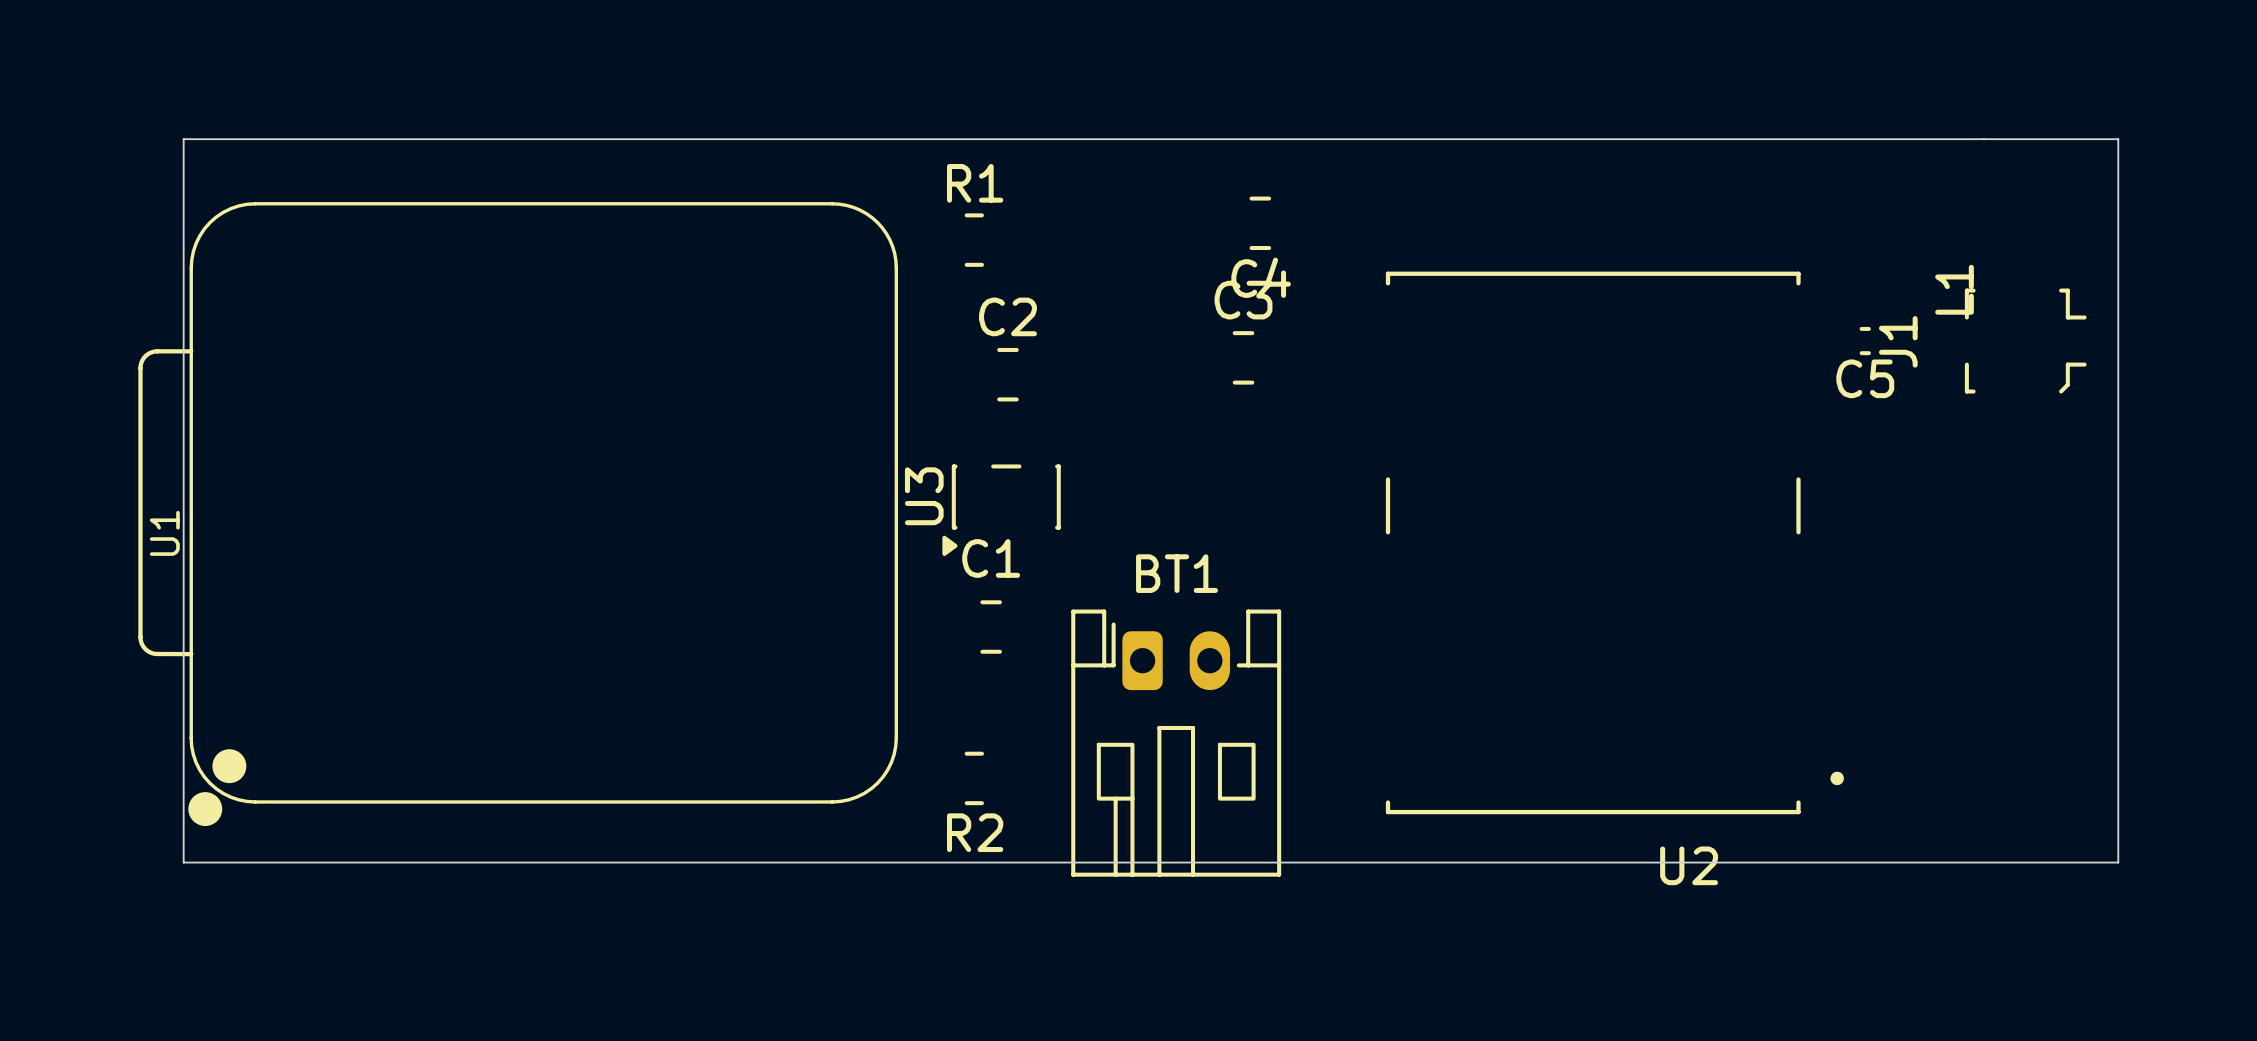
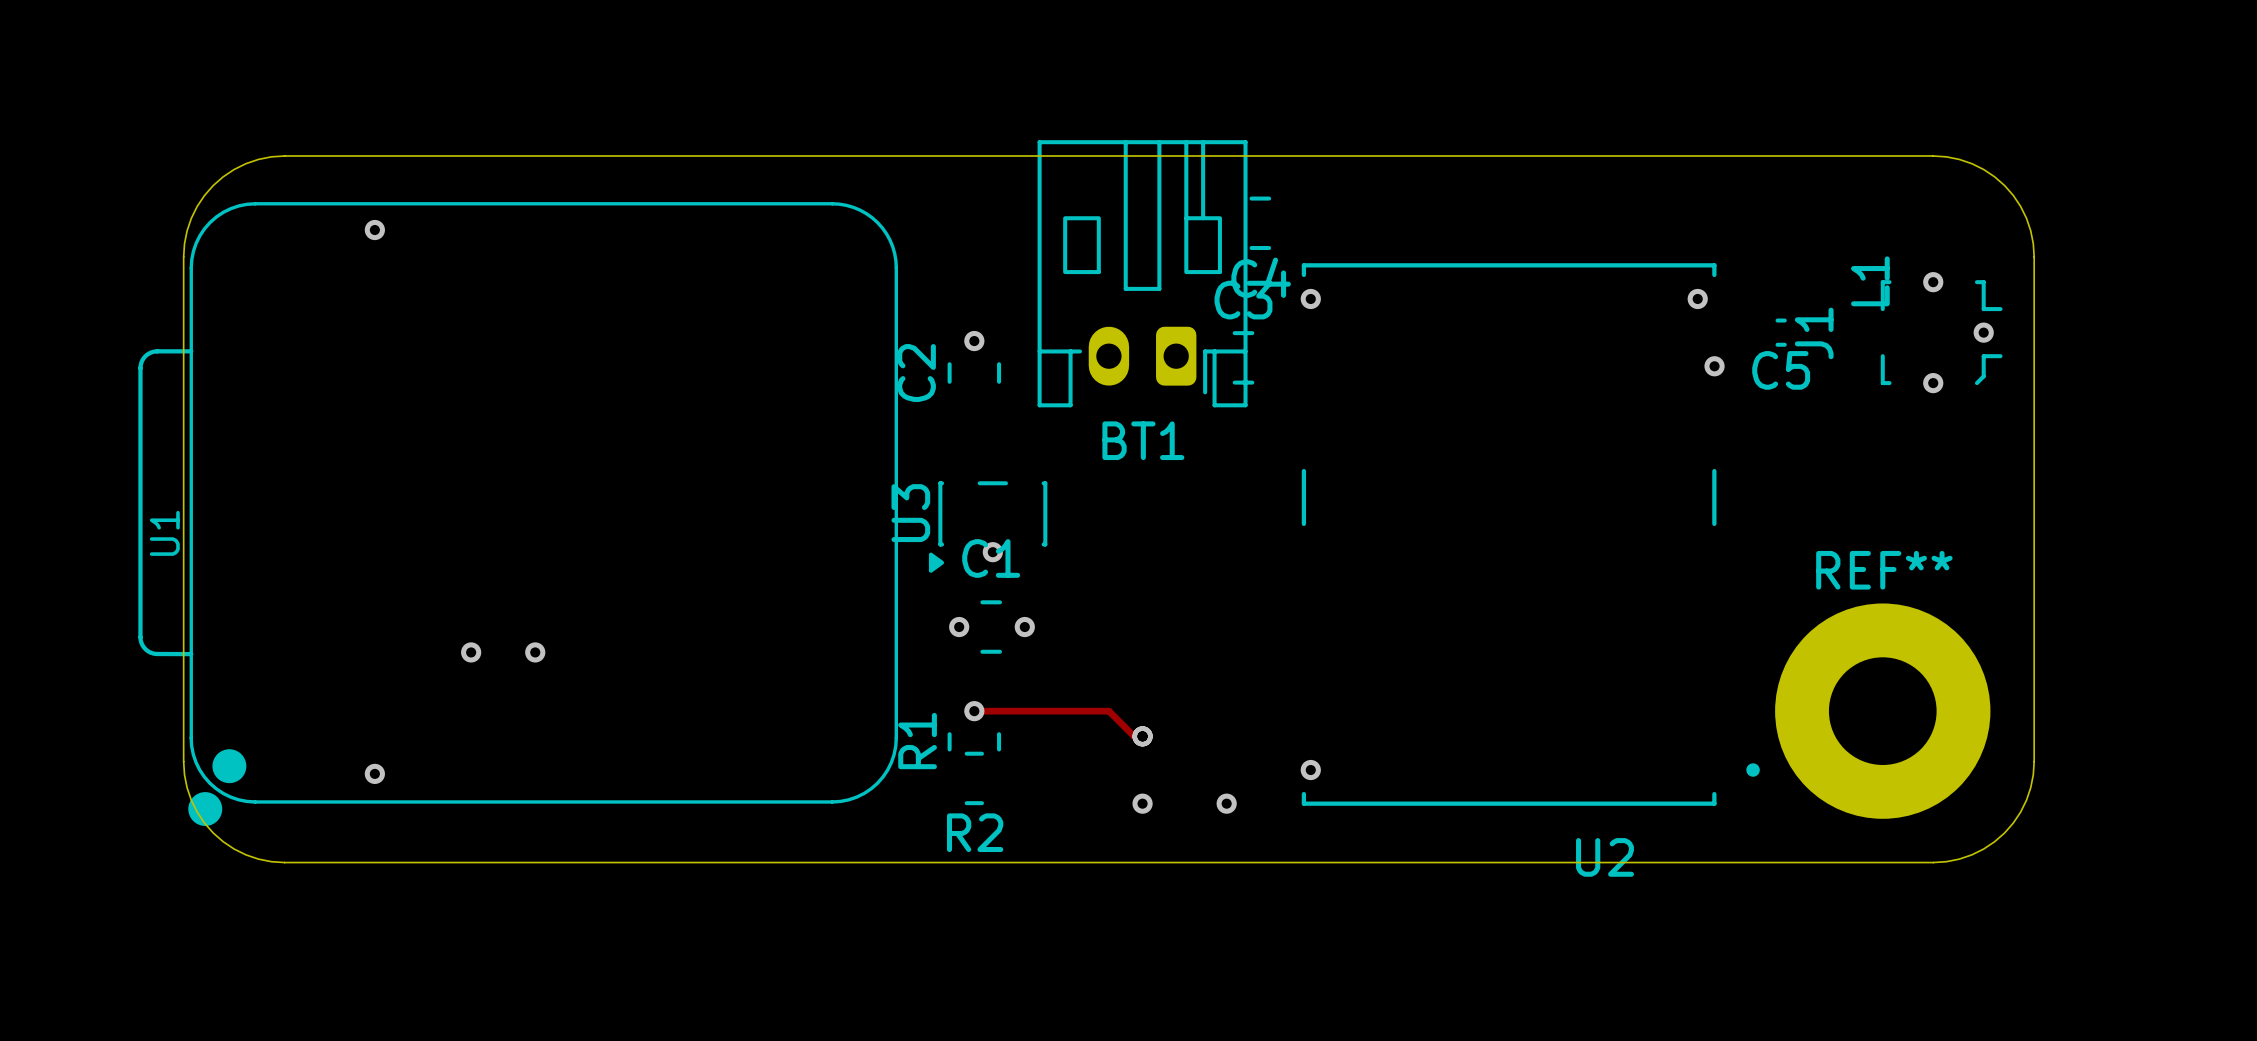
R1 name position: R1 (975, 183) -> R1 (917, 741)
via: none -> (374, 230)
R1 rotation: 0° (974, 240) -> 90° clockwise (974, 741)
R1 position: (974, 240) -> (974, 741)
board edge: (183, 256) (183, 139) (2118, 139) (2118, 862) (1933, 862) -> (183, 256) (184, 243) (191, 218) (197, 206) (213, 185) (223, 176) (245, 163) (258, 159) (284, 155) (1933, 155) (1946, 156) (1971, 163) (1994, 176) (2013, 195) (2026, 218) (2033, 243) (2034, 761) (2033, 774) (2026, 800) (2020, 812) (2004, 832) (1983, 849) (1971, 854) (1946, 861) (1933, 862)
via: none -> (1933, 282)
L1 position: (1954, 289) -> (1870, 281)
via: none -> (1310, 298)
via: none -> (1697, 298)
C2 name position: C2 (1007, 316) -> C2 (916, 373)
via: none -> (1983, 332)
via: none -> (974, 341)
C5 position: (1865, 341) -> (1781, 332)
J1 position: (2025, 341) -> (1941, 332)
via: none -> (1714, 366)
C2 rotation: 0° (1007, 374) -> 90° clockwise (974, 373)
C2 position: (1007, 374) -> (974, 373)
via: none -> (1933, 383)
U3 position: (1001, 510) -> (988, 527)
U2 position: (1614, 542) -> (1530, 534)
via: none -> (992, 552)
via: none -> (959, 627)
via: none -> (1024, 627)
via: none -> (471, 652)
via: none -> (535, 652)
track: none -> (974, 711) (1108, 711) (1134, 736) (1142, 736)
via: none -> (974, 711)
REF**: none -> (1882, 711)
via: none -> (1142, 736)
BT1 rotation: 0° (1176, 743) -> 180° (1142, 273)
BT1 position: (1176, 743) -> (1142, 273)
board edge: (183, 761) (183, 862) (284, 862) -> (183, 761) (187, 787) (191, 800) (204, 823) (213, 832) (223, 841) (245, 854) (258, 859) (284, 862)
via: none -> (1310, 770)
via: none -> (374, 773)
via: none -> (1142, 803)
via: none -> (1226, 803)

